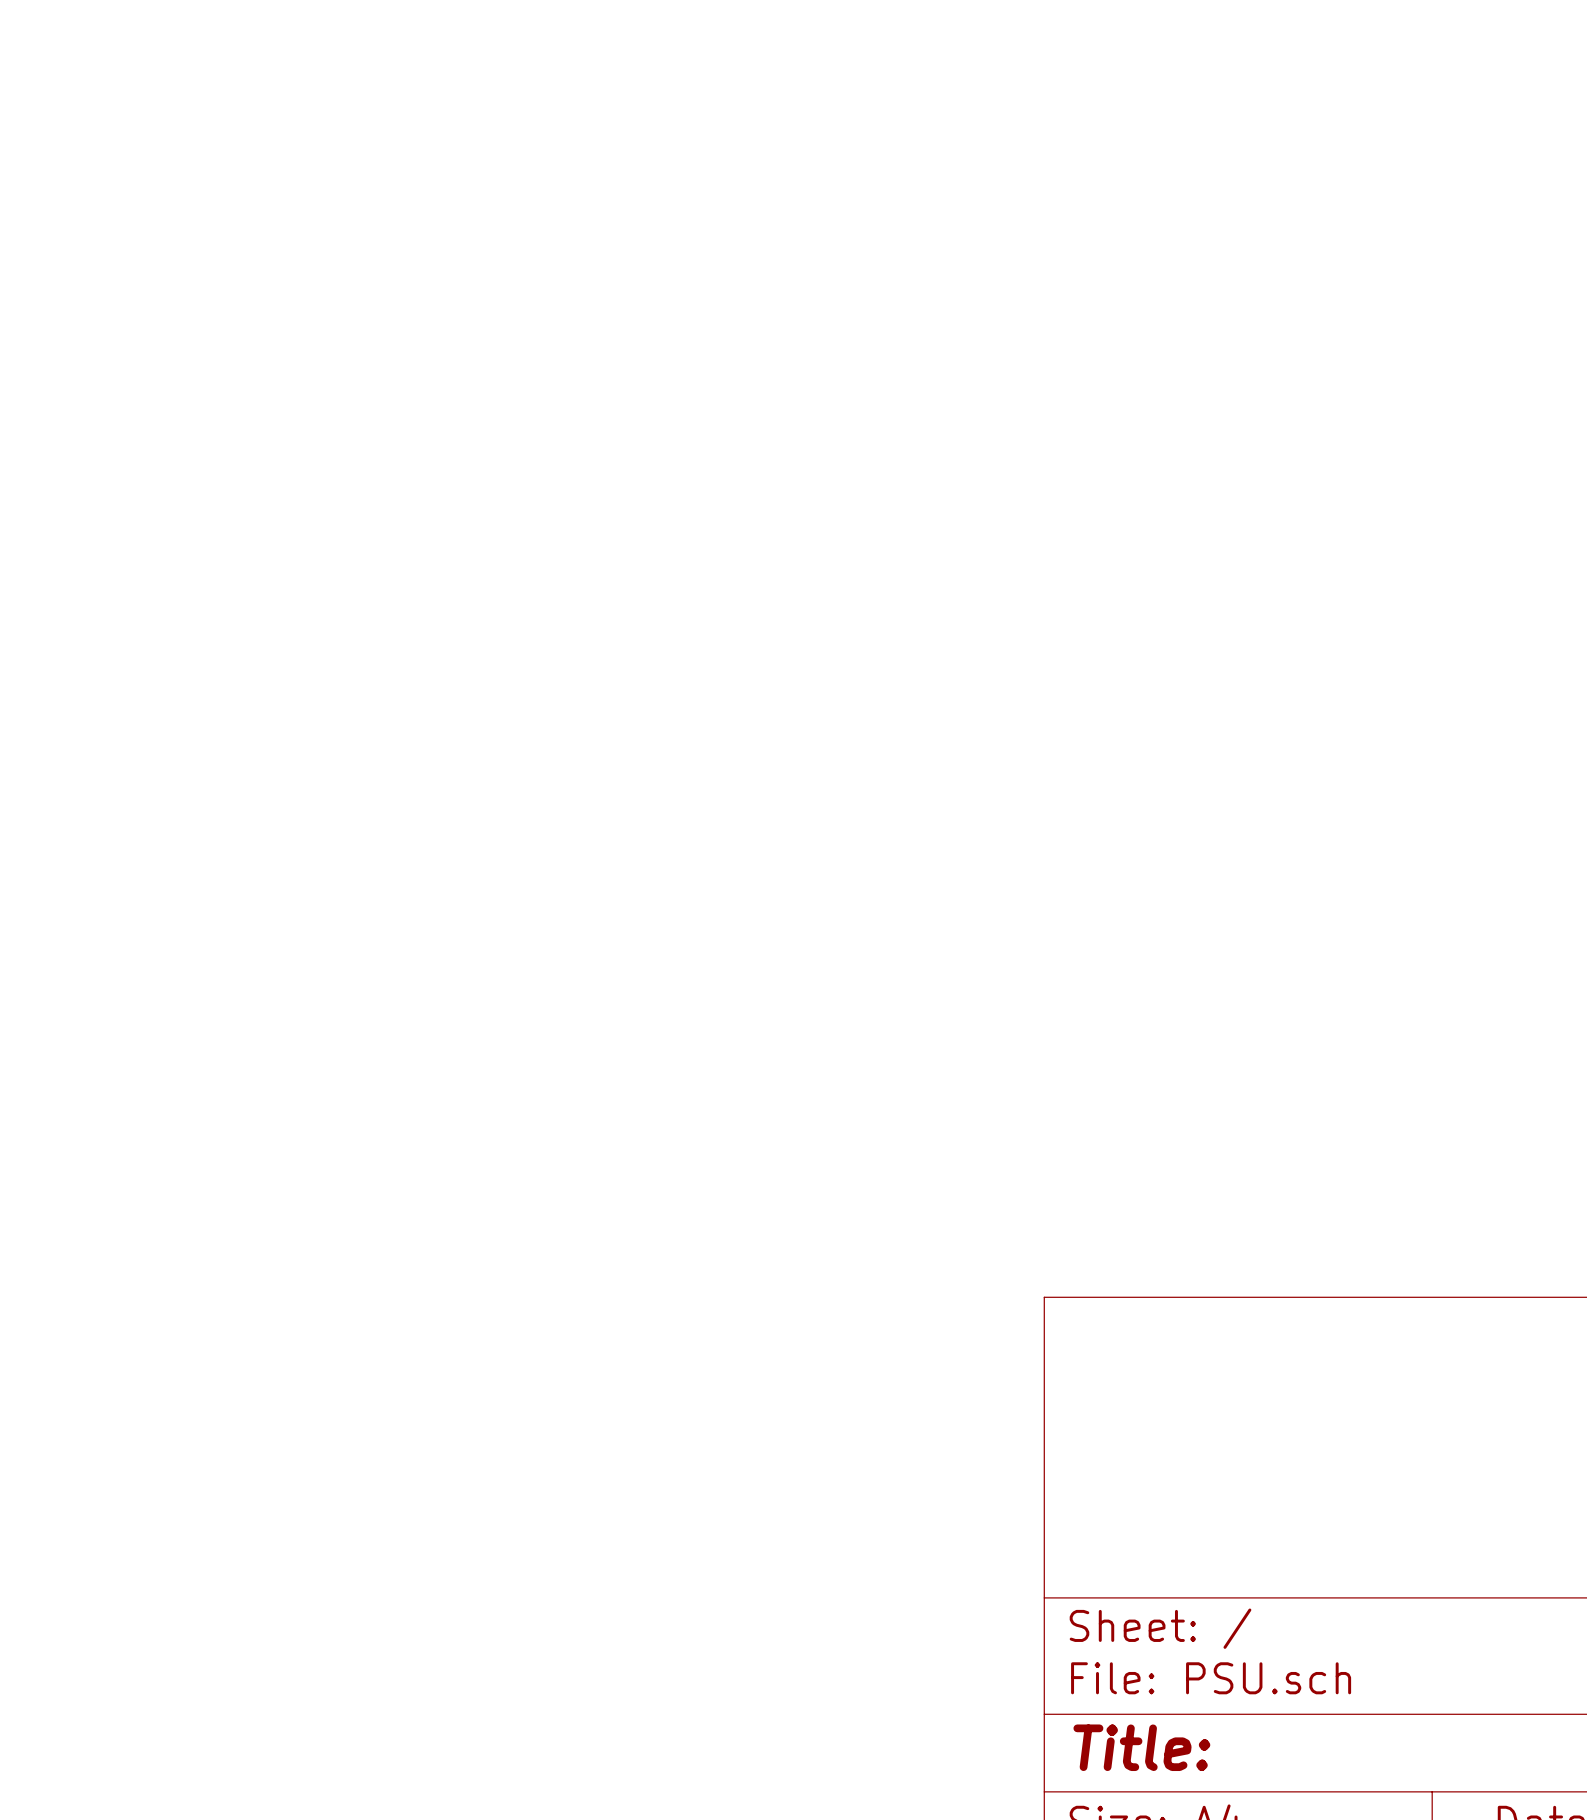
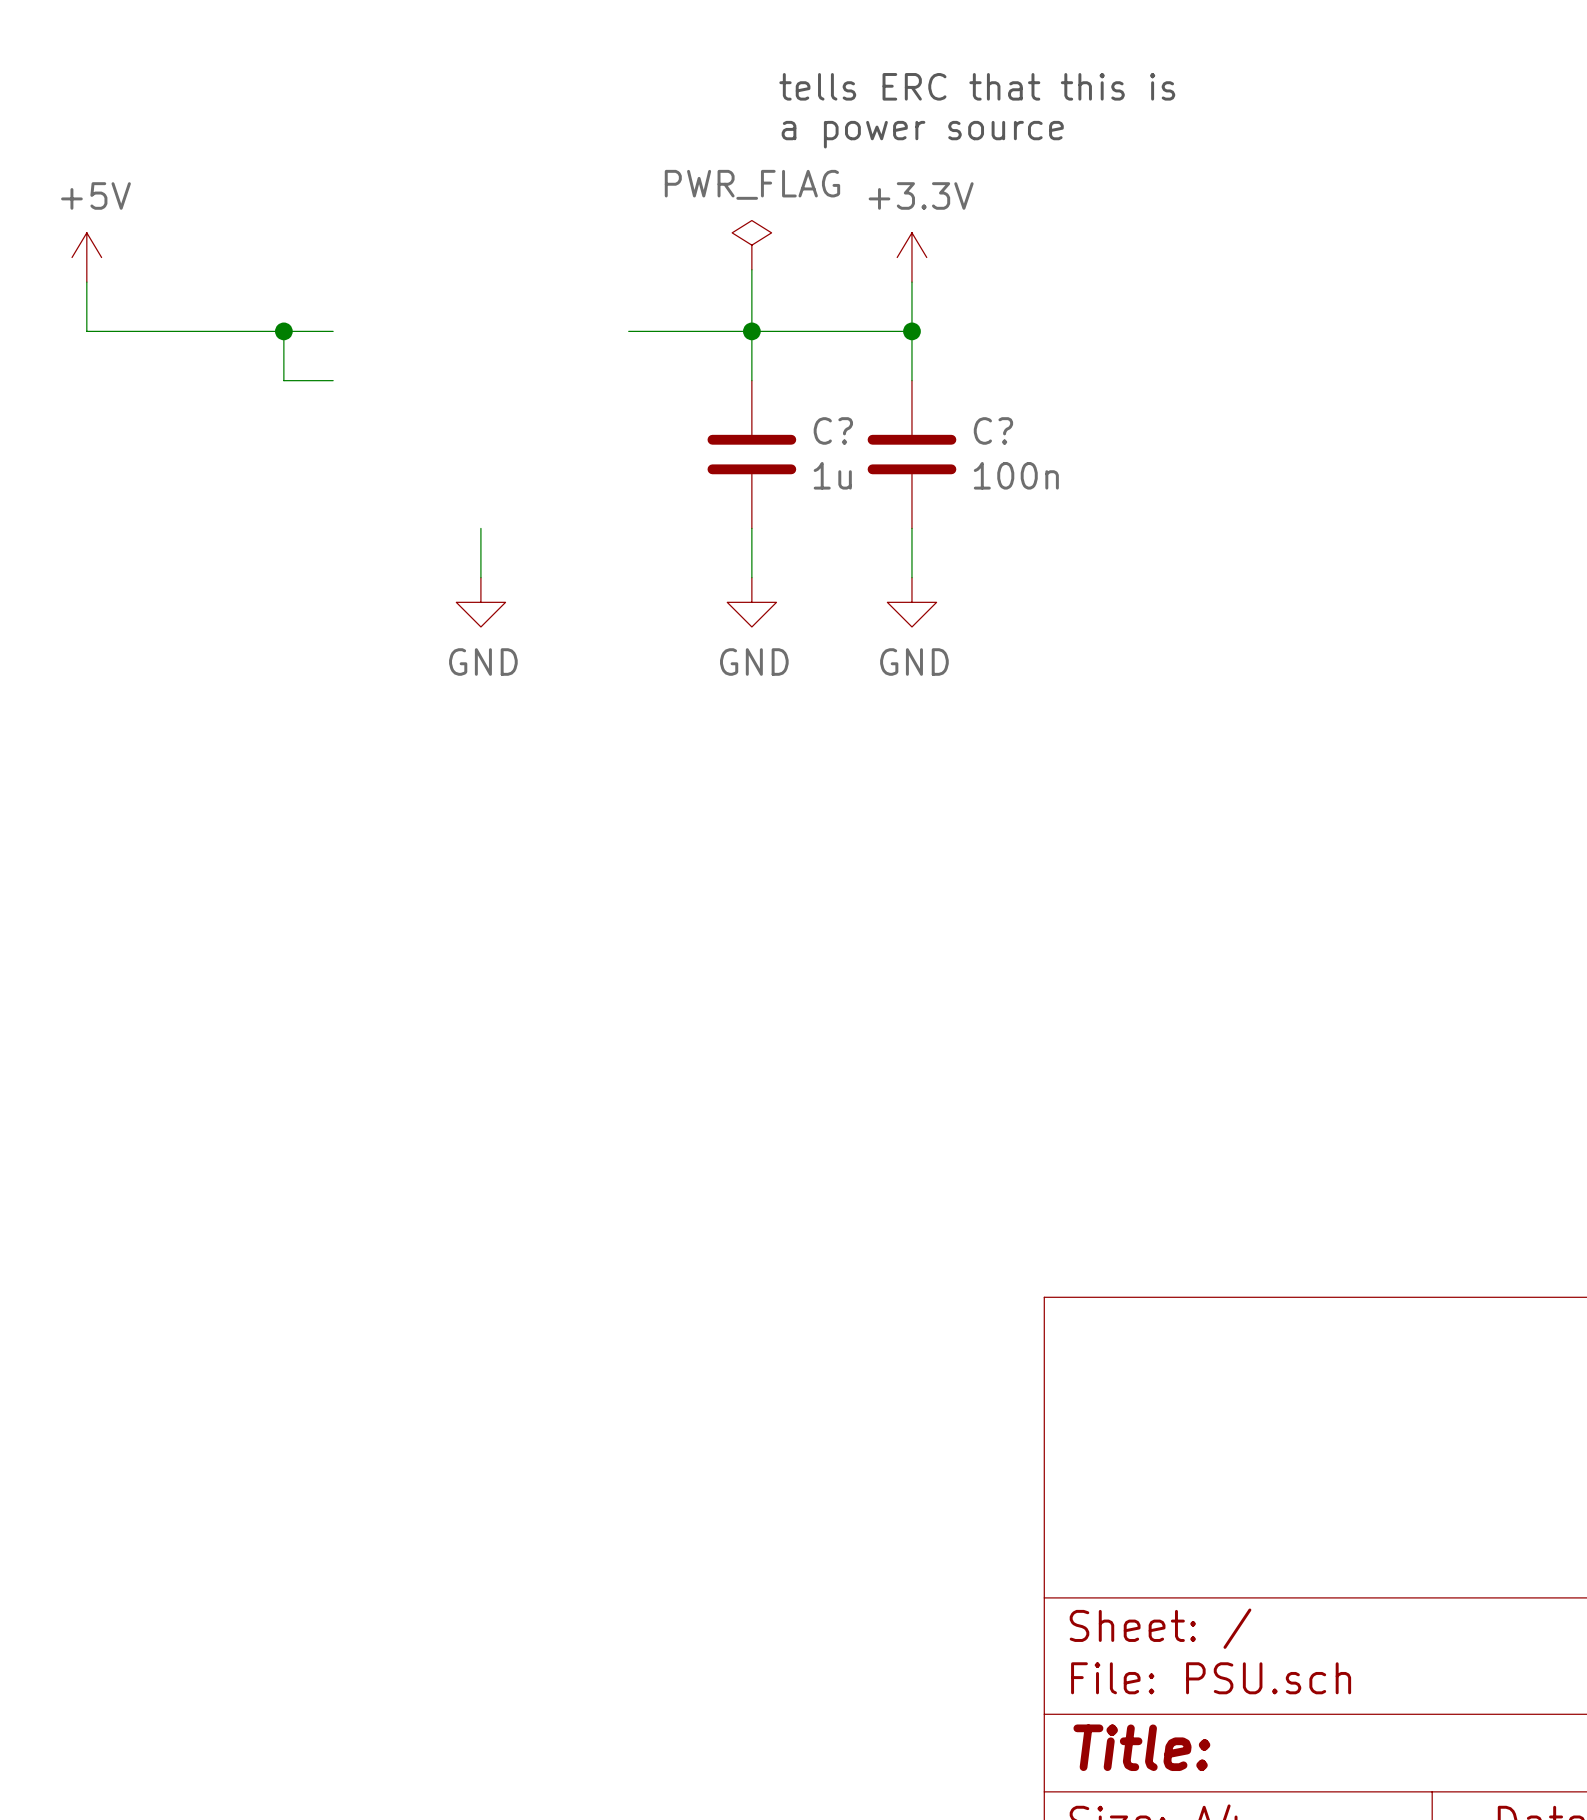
text: none -> tells ERC that this is (977, 86)
text: none -> a power source (922, 134)
power symbol: none -> PWR_FLAG (751, 245)
power symbol: none -> +5V (86, 257)
power symbol: none -> +3.3V (911, 257)
wire: none -> (751, 269) (751, 380)
wire: none -> (86, 282) (86, 331) (333, 331)
wire: none -> (911, 282) (911, 380)
wire: none -> (283, 331) (283, 380) (333, 380)
junction: none -> (283, 331)
wire: none -> (628, 331) (911, 331)
junction: none -> (751, 331)
junction: none -> (911, 331)
C?: none -> 1u (751, 454)
C?: none -> 100n (911, 454)
wire: none -> (480, 528) (480, 577)
wire: none -> (751, 528) (751, 577)
wire: none -> (911, 528) (911, 577)
power symbol: none -> GND (480, 602)
power symbol: none -> GND (751, 602)
power symbol: none -> GND (911, 602)

